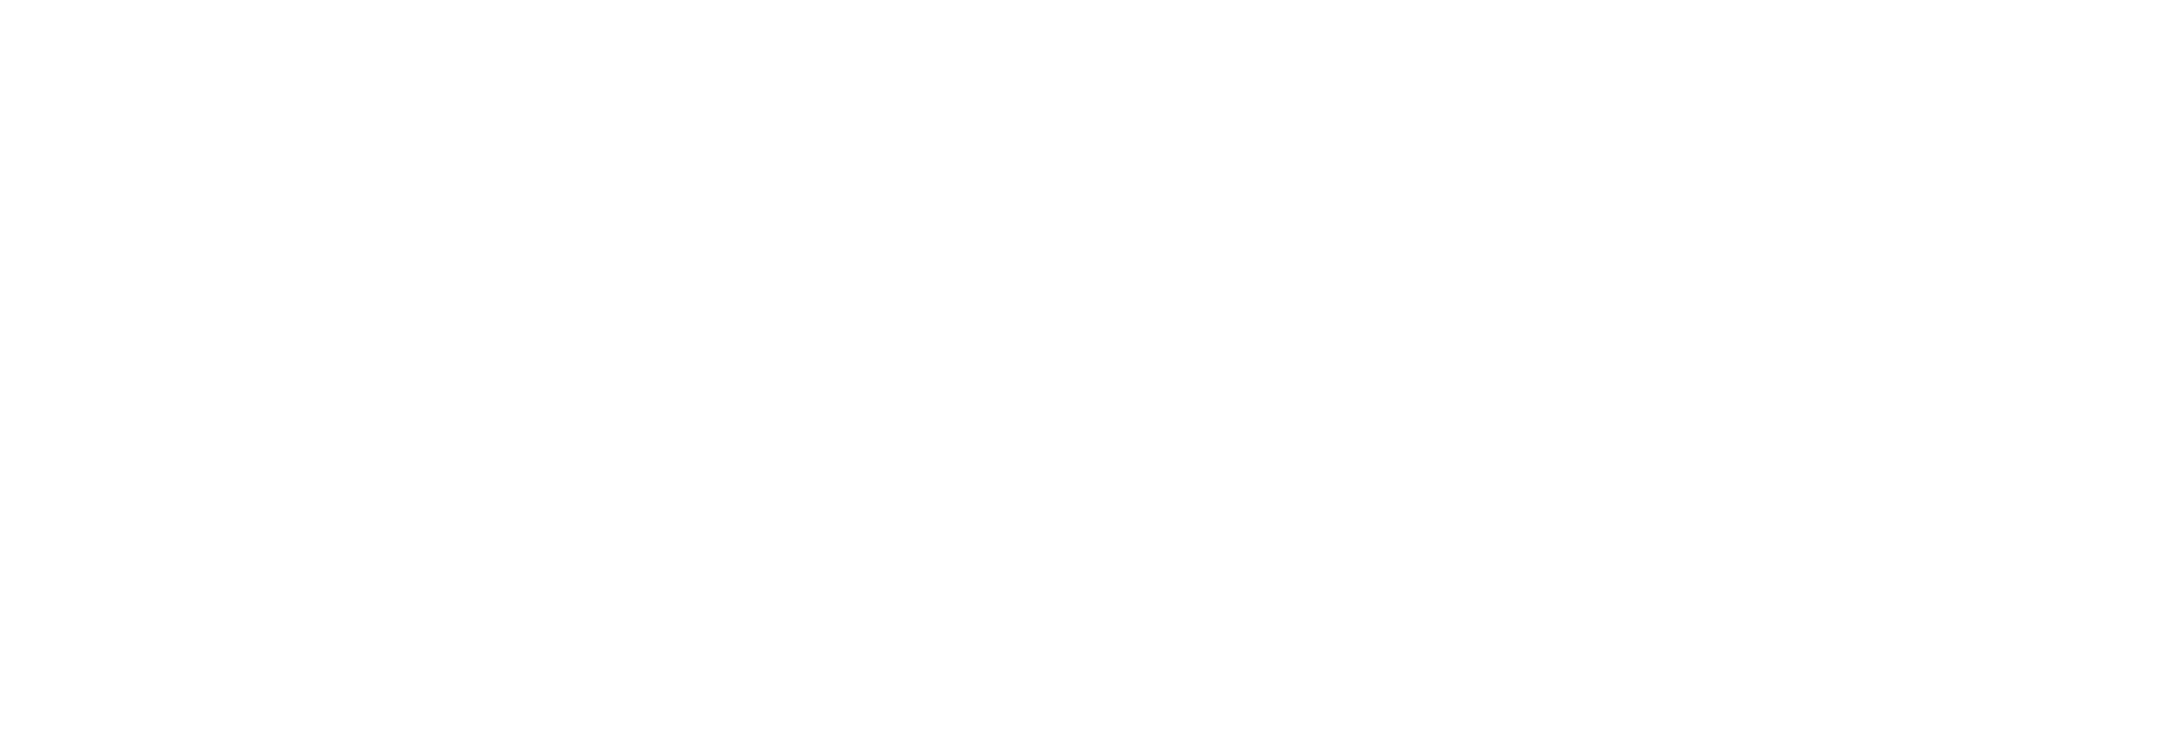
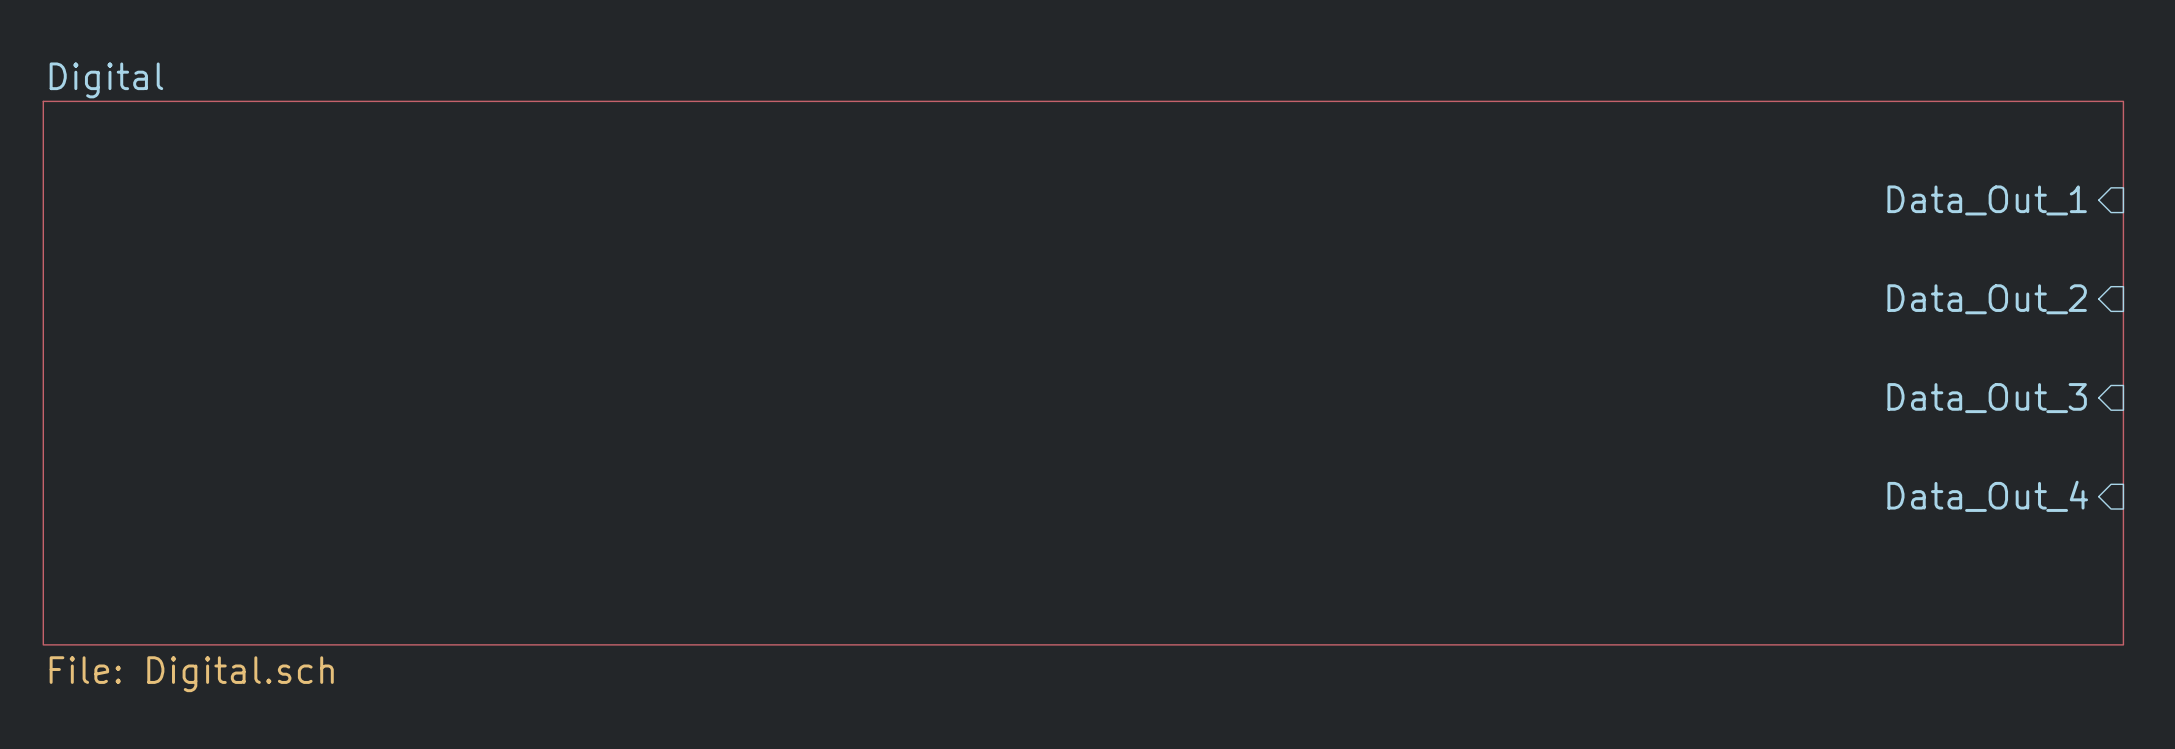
sheet pin: none -> Data_Out_1 (1987, 200)
sheet pin: none -> Data_Out_2 (1987, 299)
sheet Digital: none -> File: Digital.sch (1083, 373)
sheet pin: none -> Data_Out_3 (1987, 398)
sheet pin: none -> Data_Out_4 (1987, 496)

